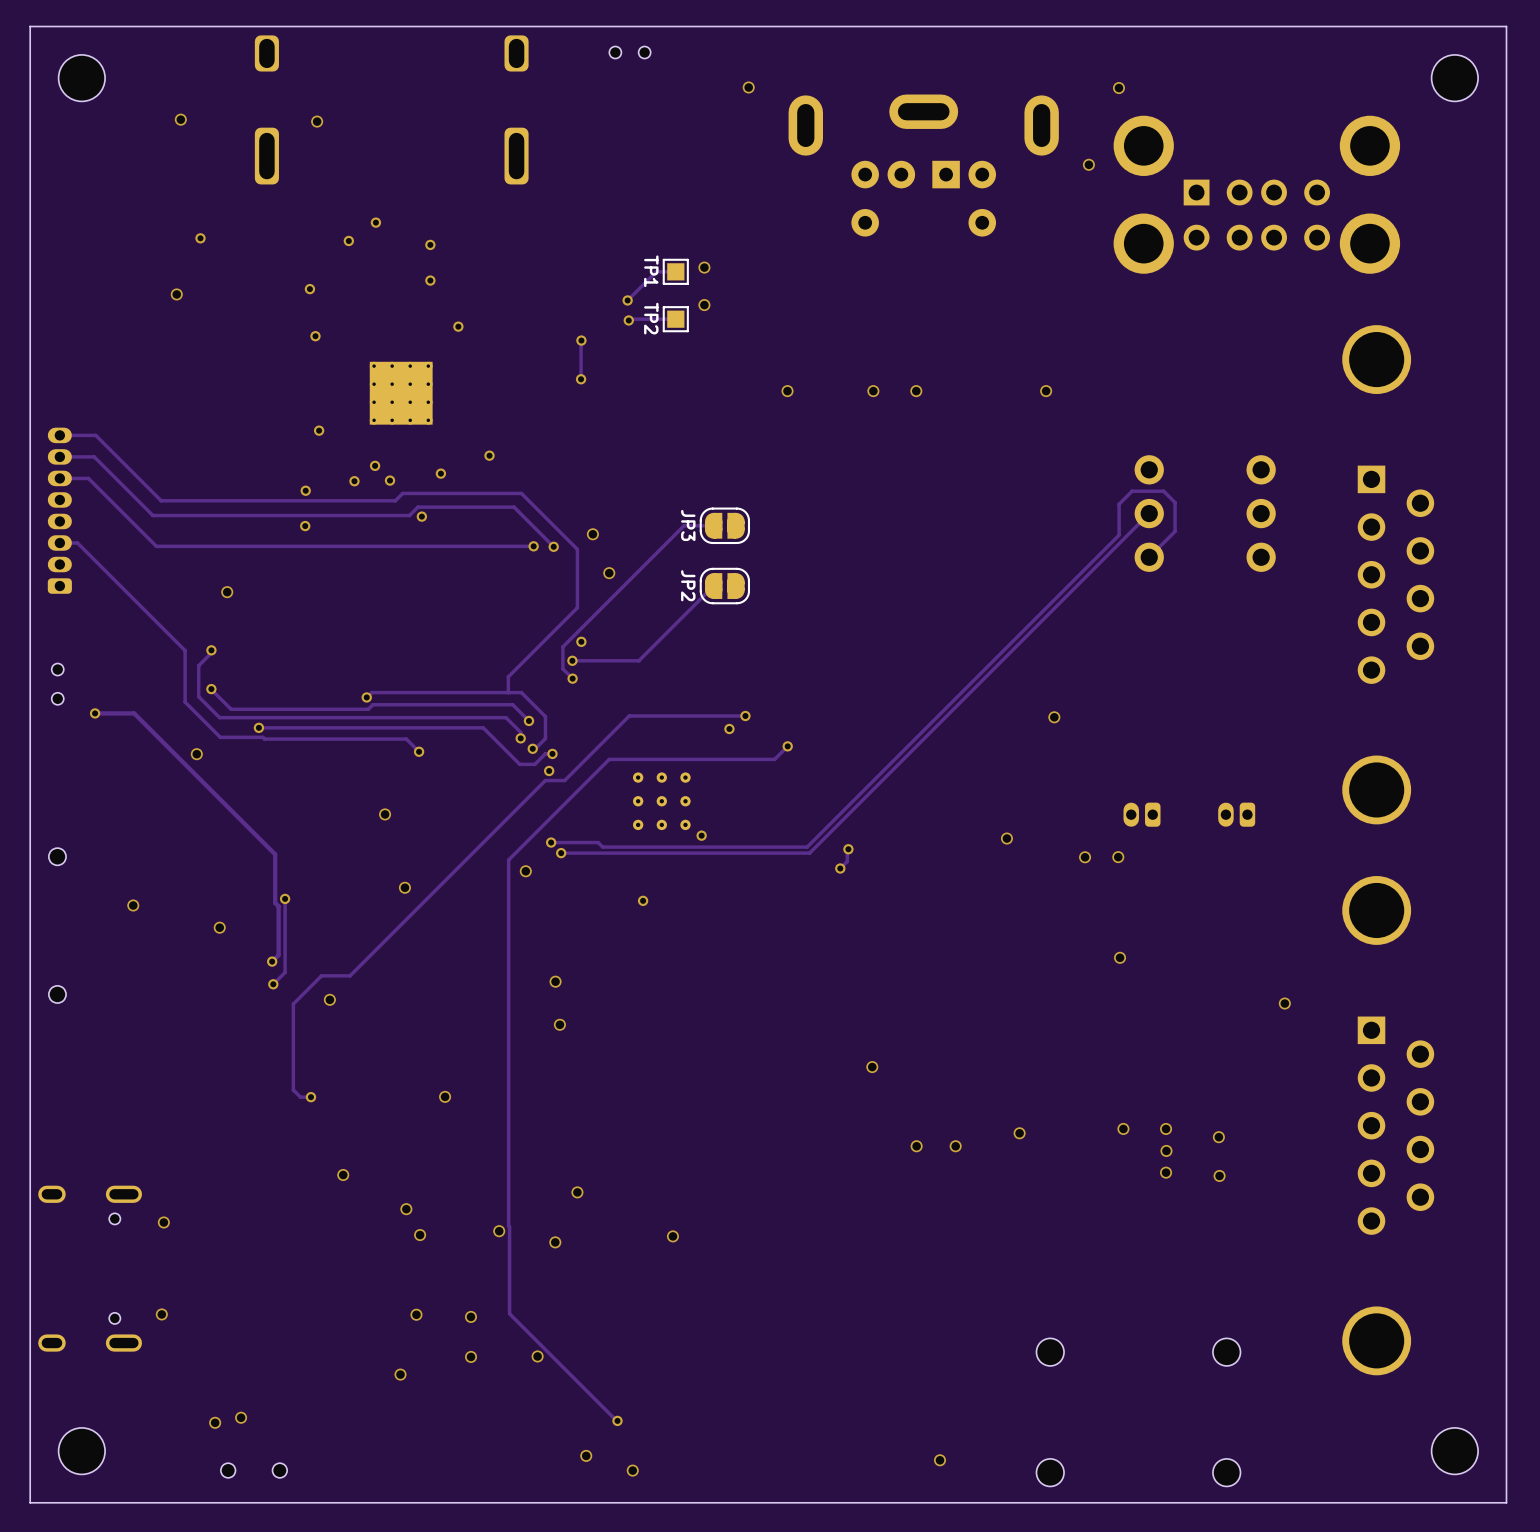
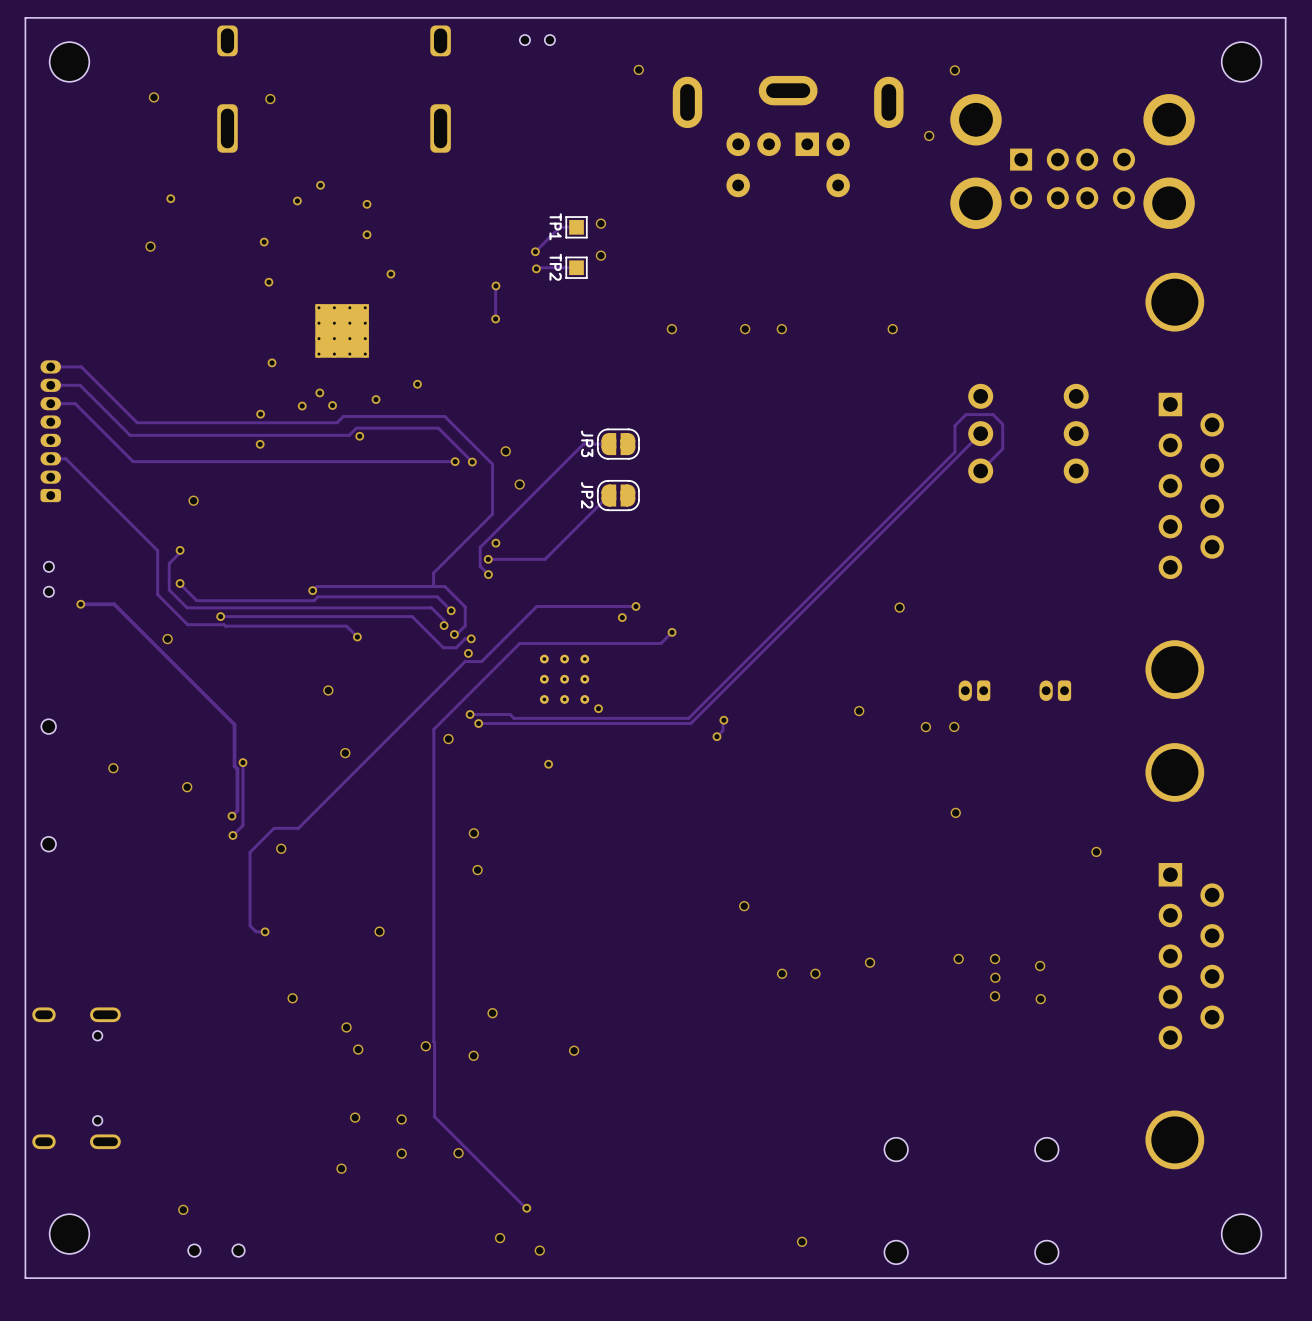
via: (163, 1222) -> none
via: (161, 1314) -> none
via: (241, 1417) -> none

